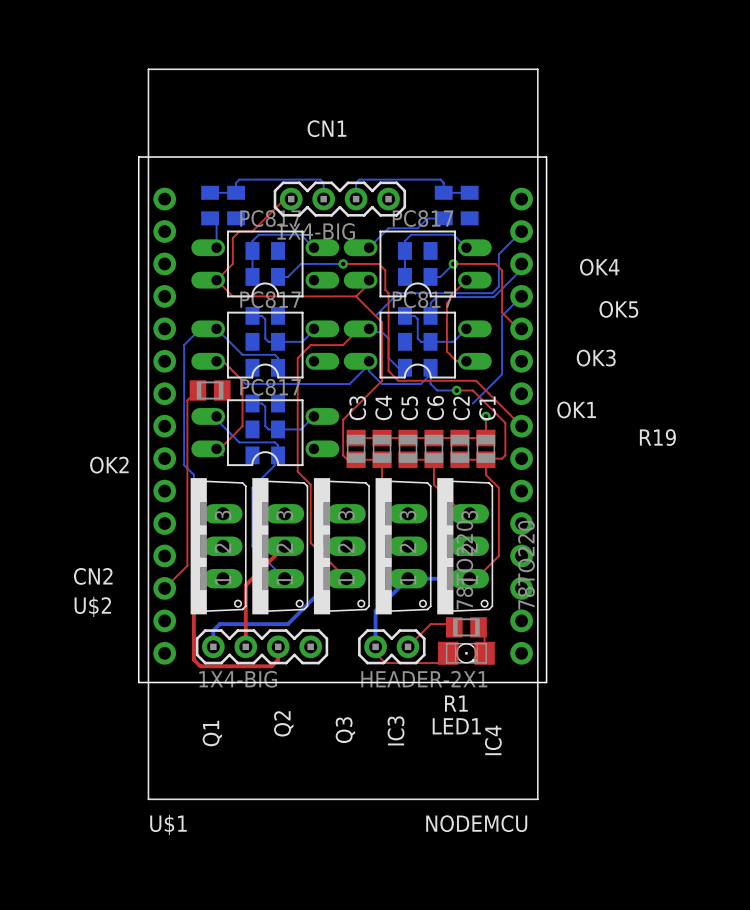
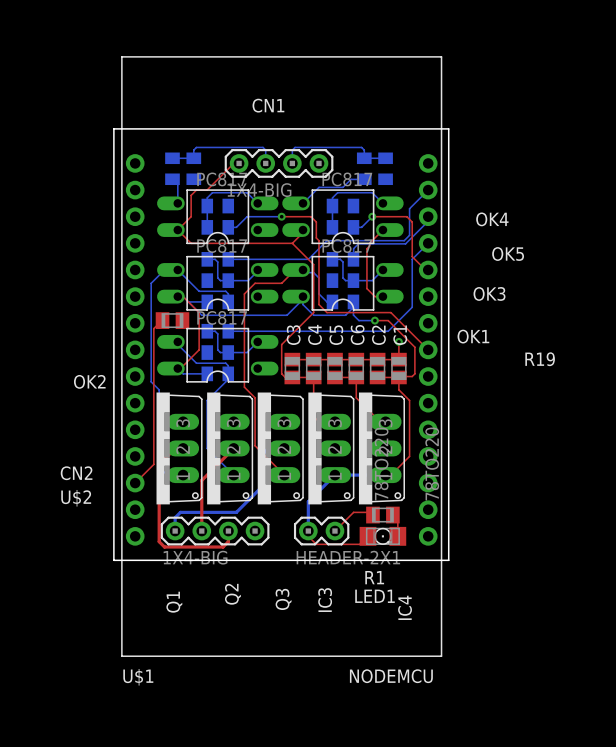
bottom track: none -> (228, 259) (308, 259)
bottom track: none -> (188, 301) (207, 301)
bottom track: none -> (228, 331) (388, 331)
bottom track: none -> (183, 373) (207, 373)

